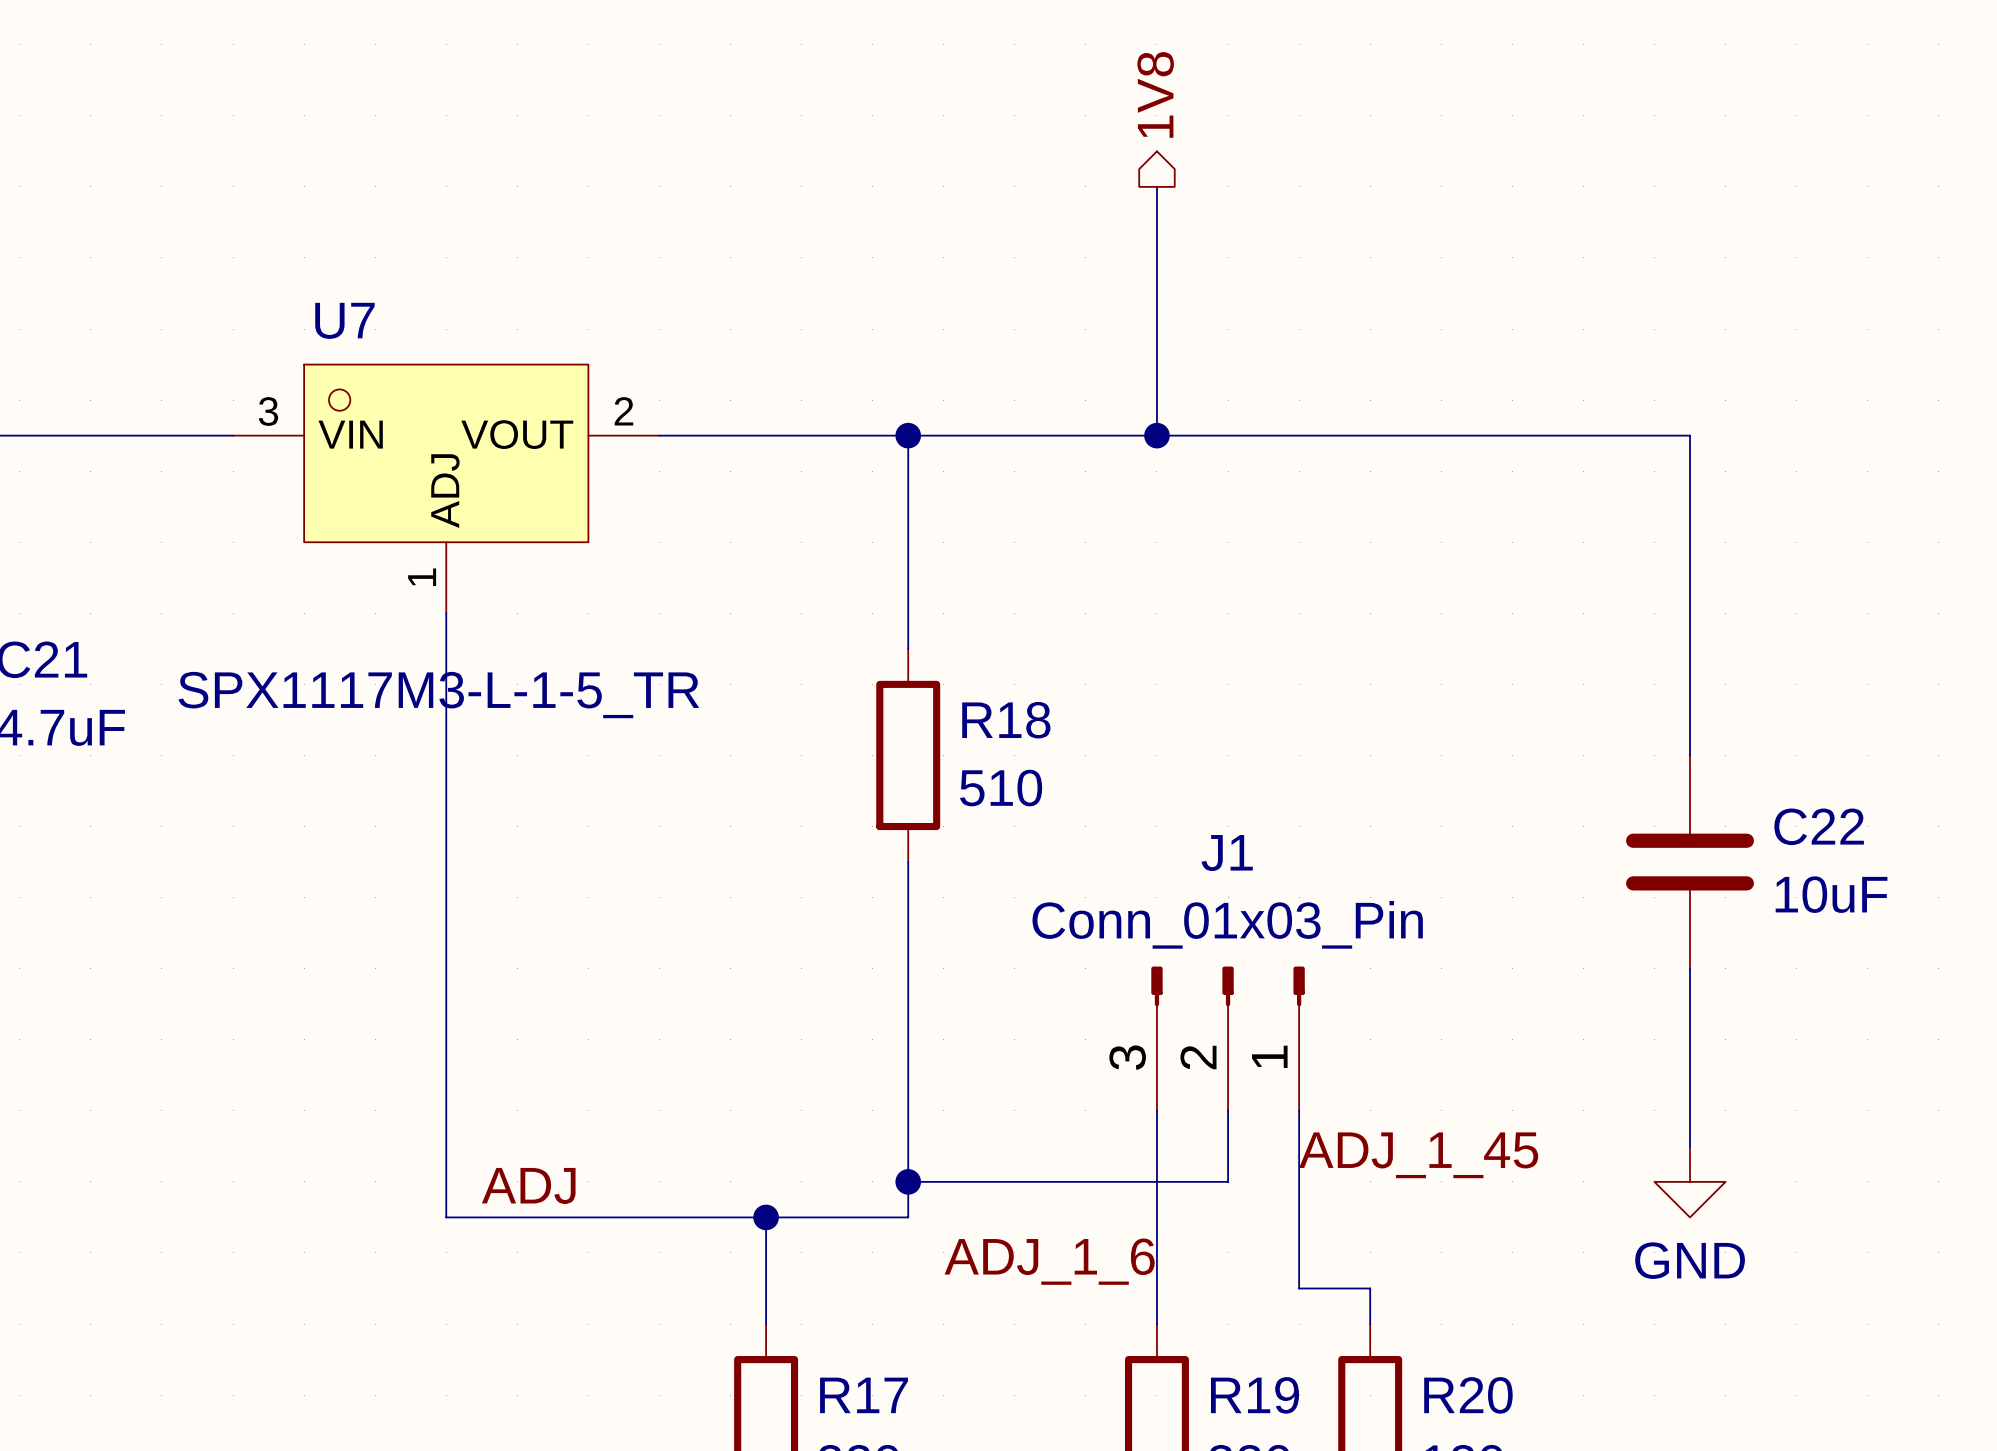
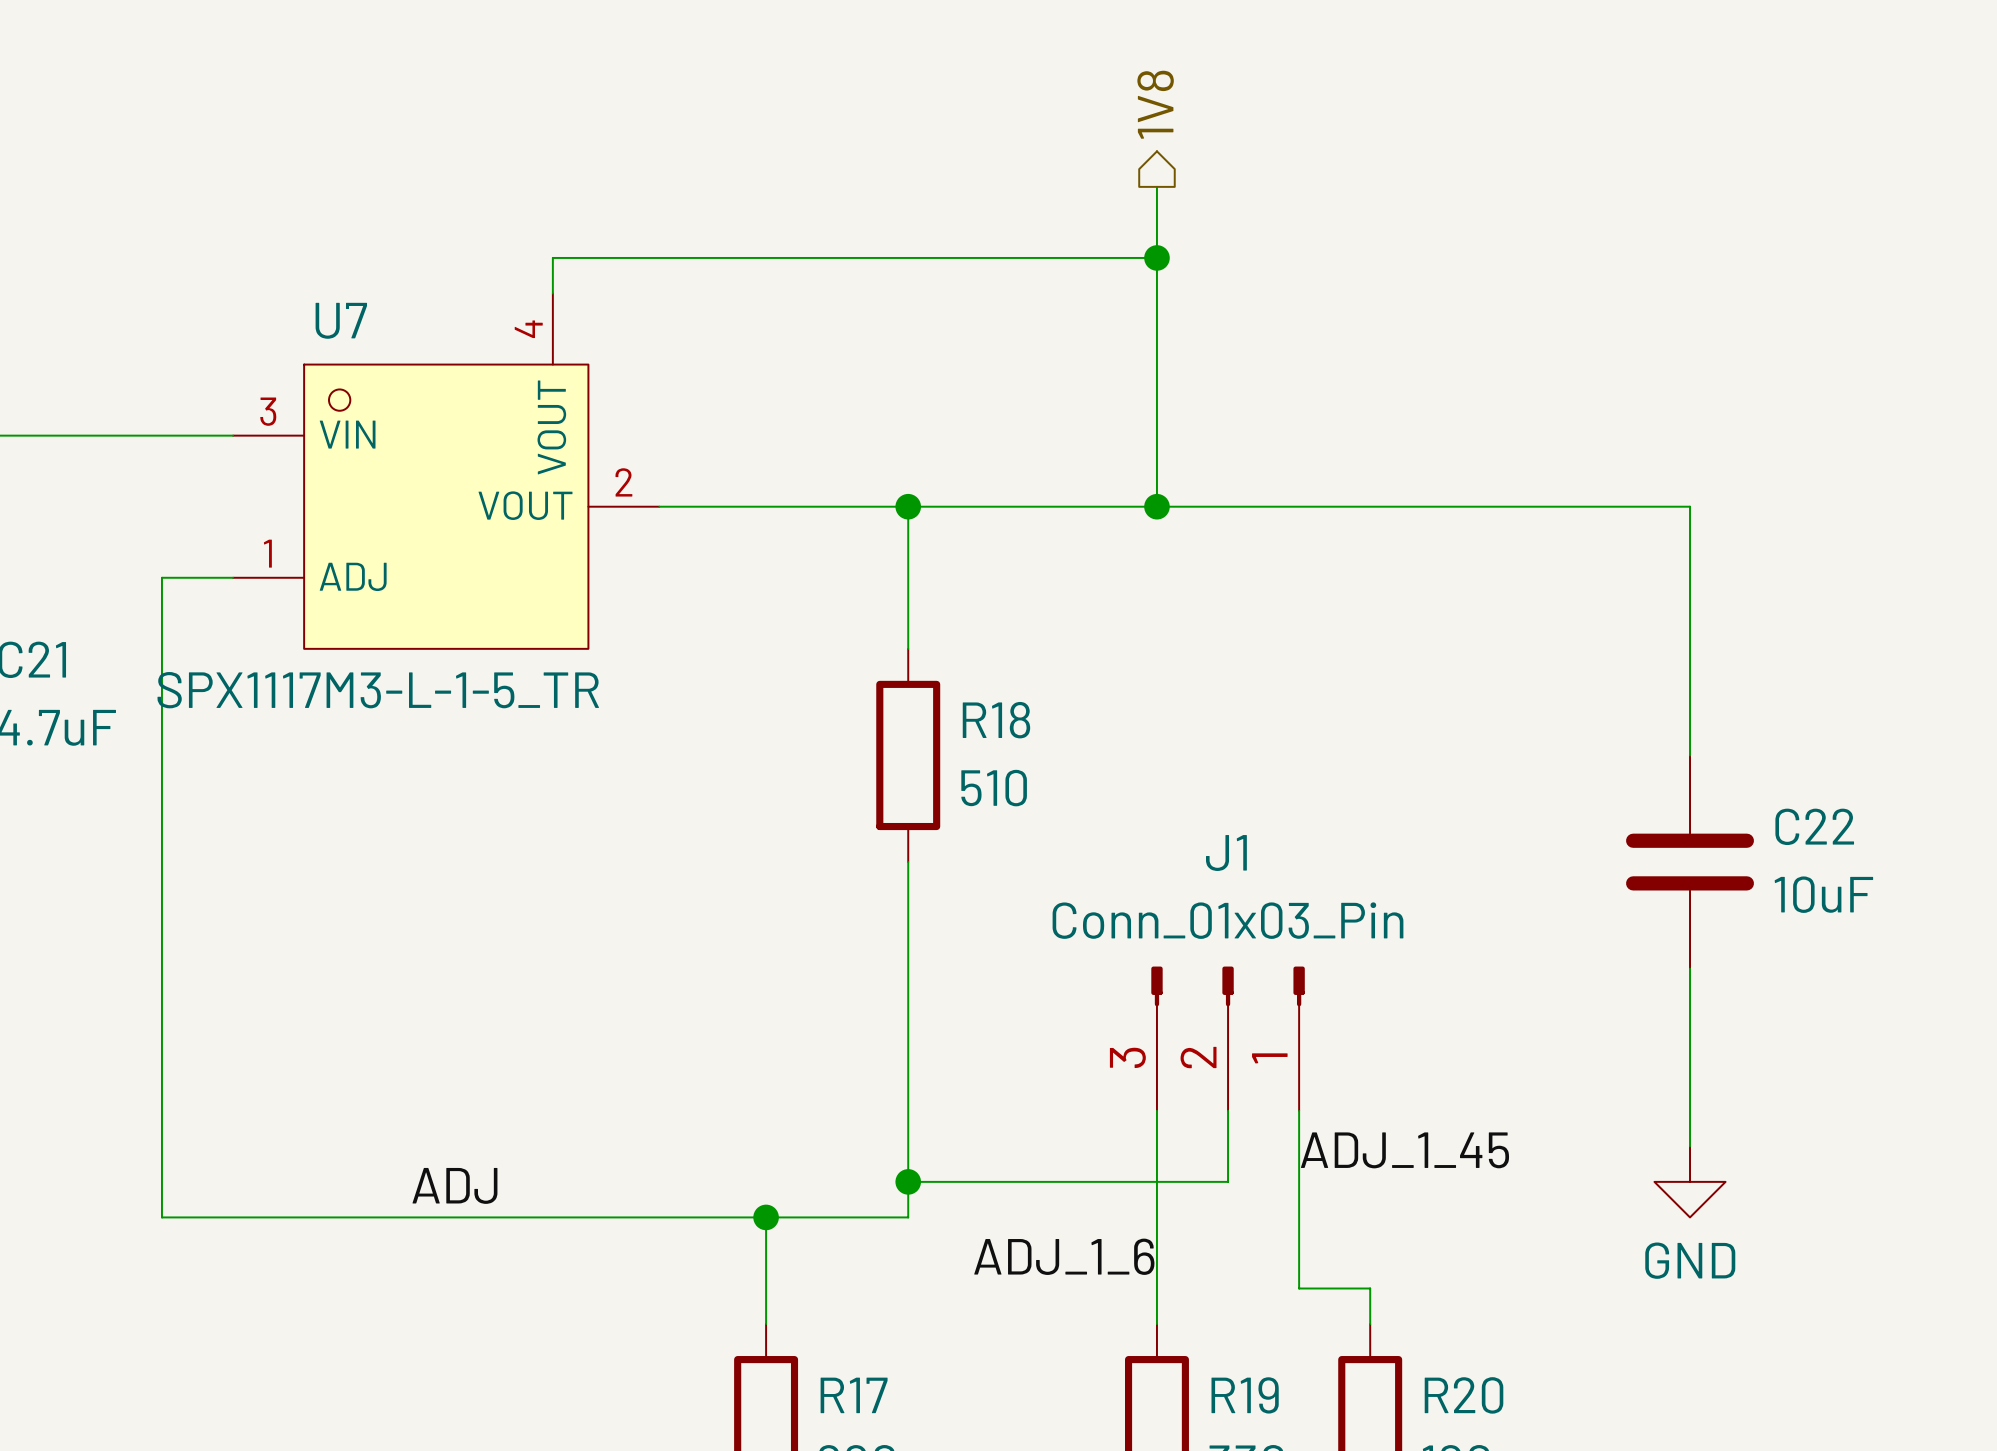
wire: none -> (1156, 257) (552, 257) (552, 293)
junction: none -> (1156, 257)
U7 symbol: [233, 364, 660, 614] -> [233, 293, 660, 649]
wire: (659, 435) (1690, 435) (1690, 506) -> (659, 506) (1690, 506)
wire: (908, 435) (908, 506) -> (1156, 435) (1156, 506)
junction position: (908, 435) -> (908, 506)
junction position: (1156, 435) -> (1156, 506)
wire: (446, 613) (446, 1217) -> (233, 577) (161, 577) (161, 1217) (446, 1217)
label position: ADJ (528, 1185) -> ADJ (454, 1185)

